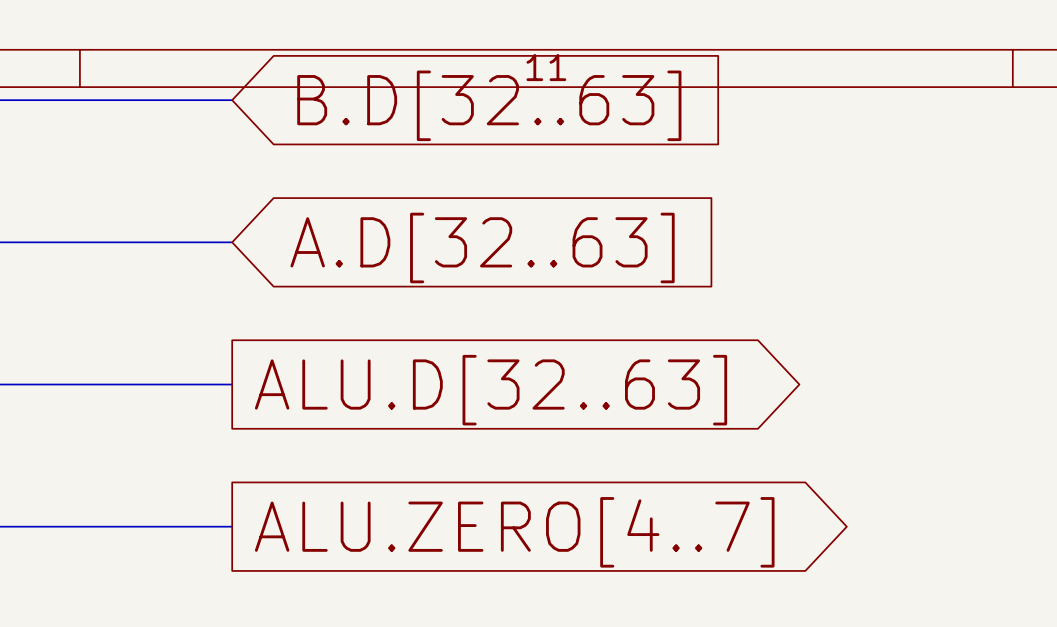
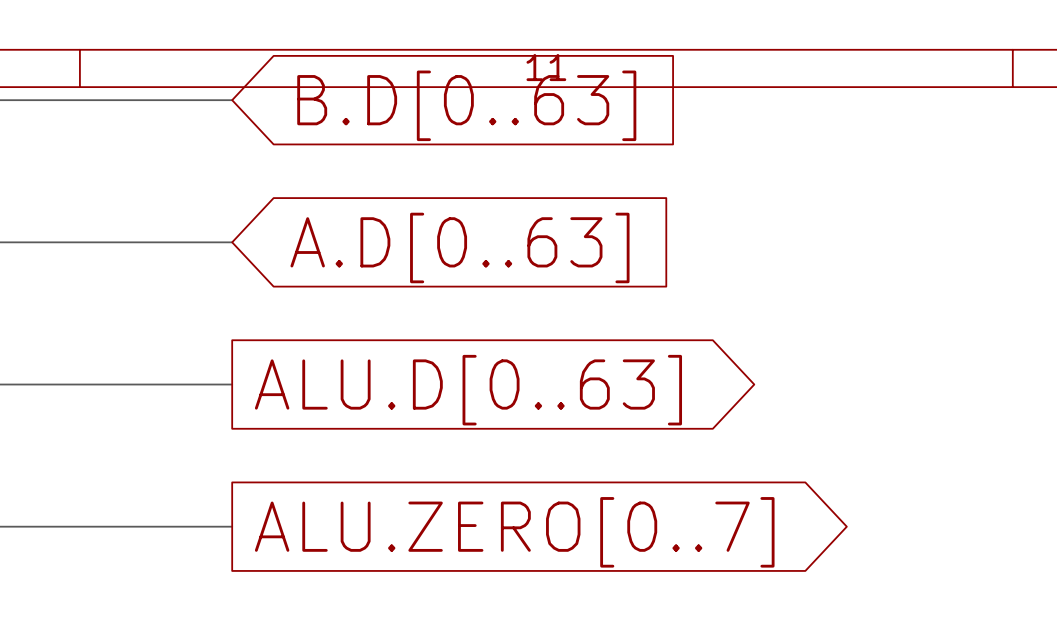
global label: B.D[32..63] (489, 105) -> B.D[0..63] (466, 105)
global label: A.D[32..63] (482, 247) -> A.D[0..63] (460, 247)
global label: ALU.D[32..63] (491, 390) -> ALU.D[0..63] (468, 390)
global label: ALU.ZERO[4..7] (514, 532) -> ALU.ZERO[0..7] (514, 532)

